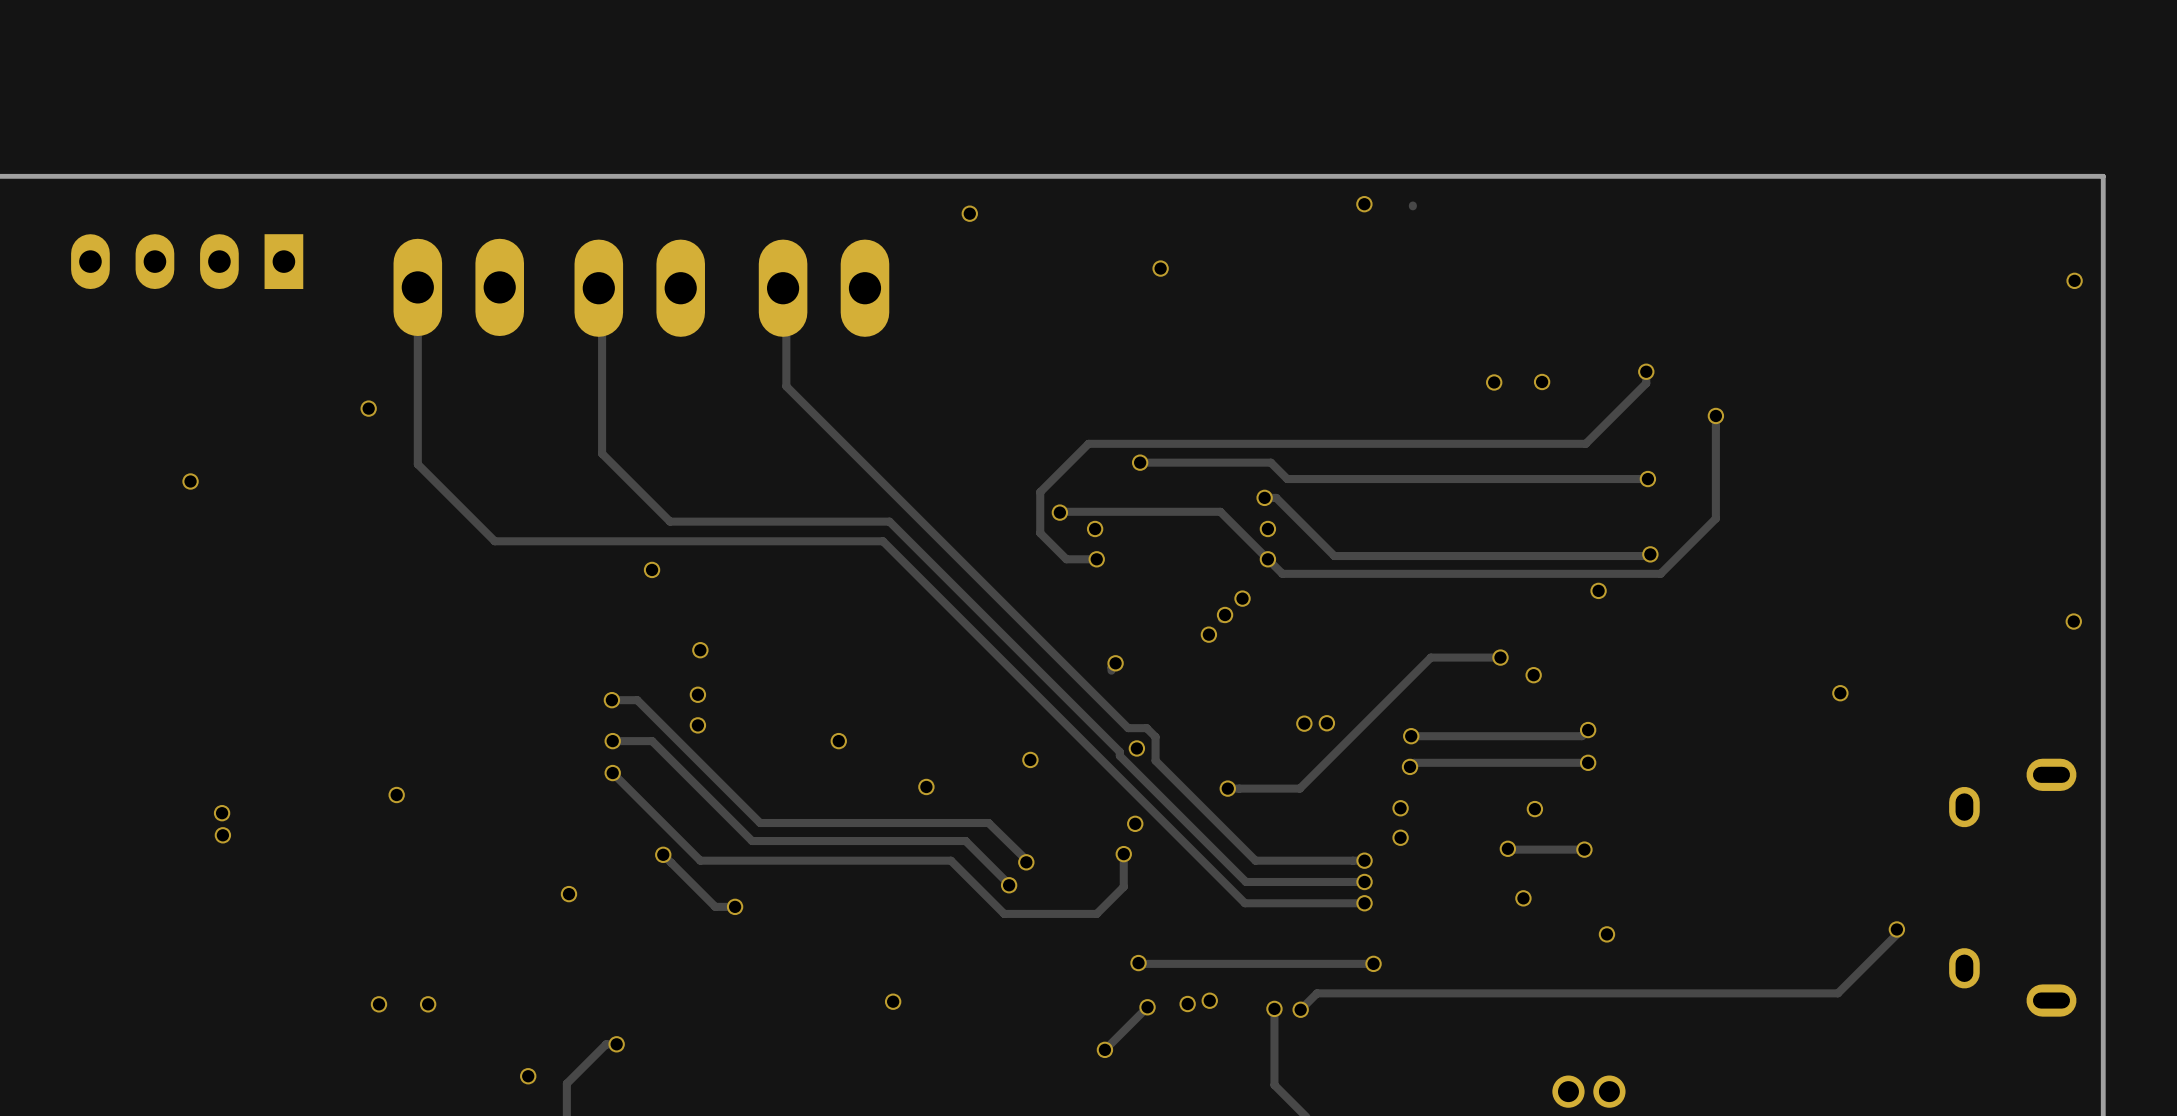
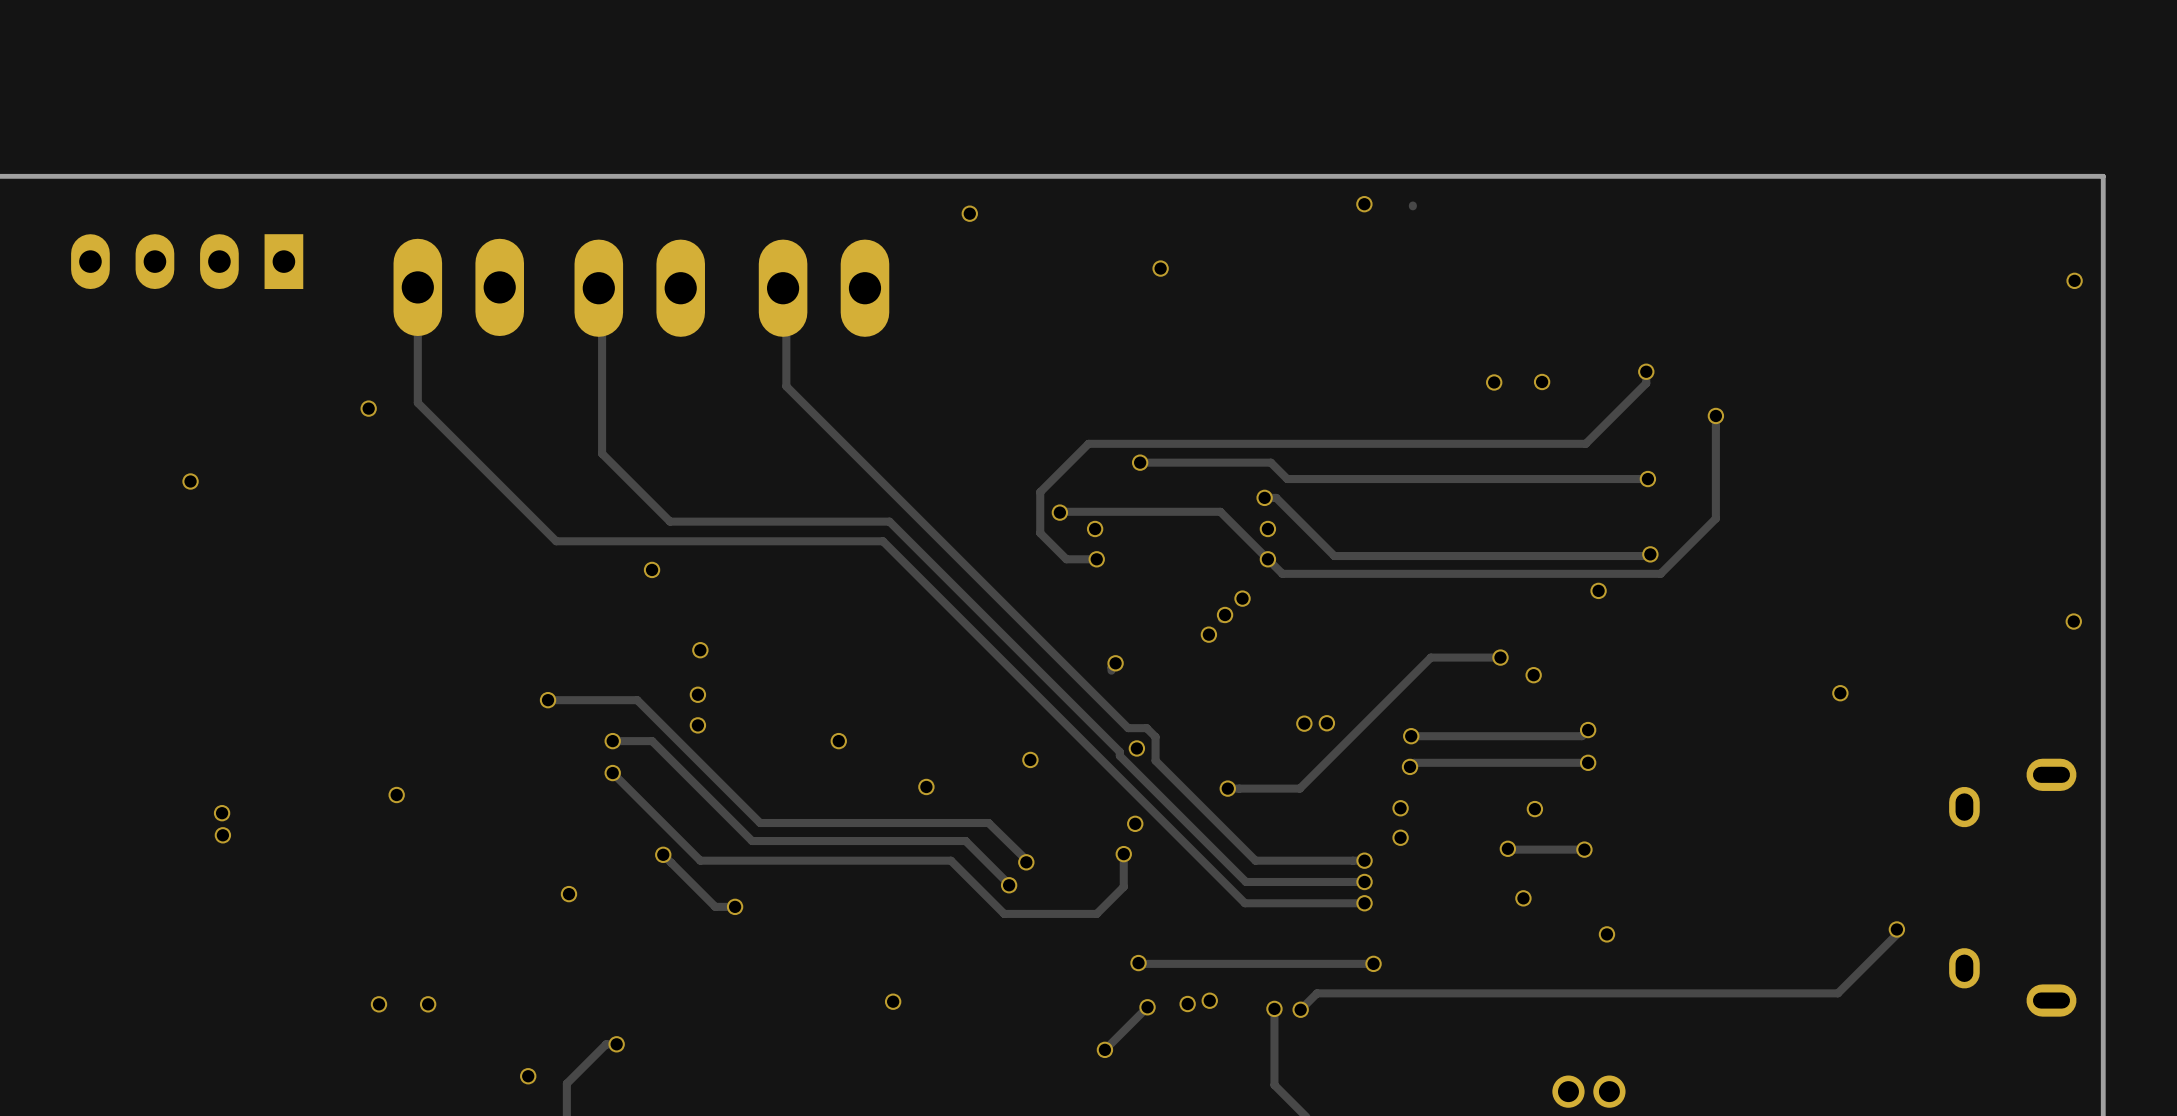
track: (417, 402) (417, 464) (494, 541) (556, 541) -> (417, 402) (556, 541)
track: none -> (611, 700) (548, 700)
via position: (611, 700) -> (548, 700)

